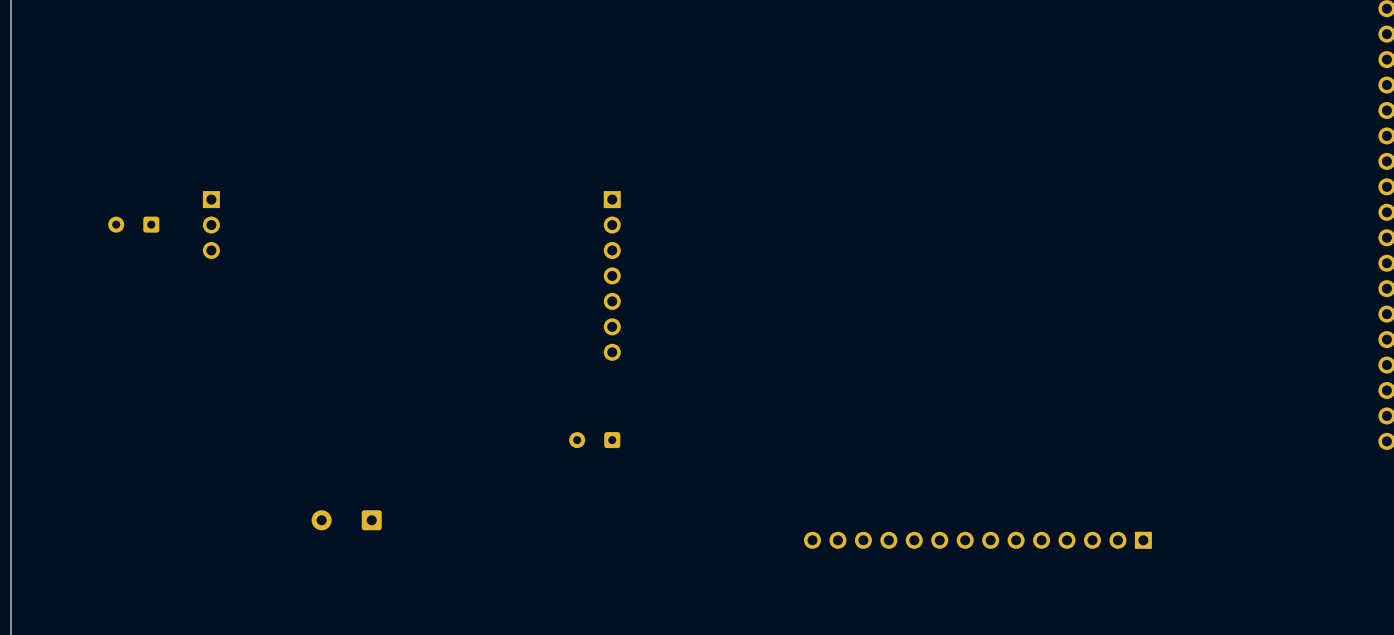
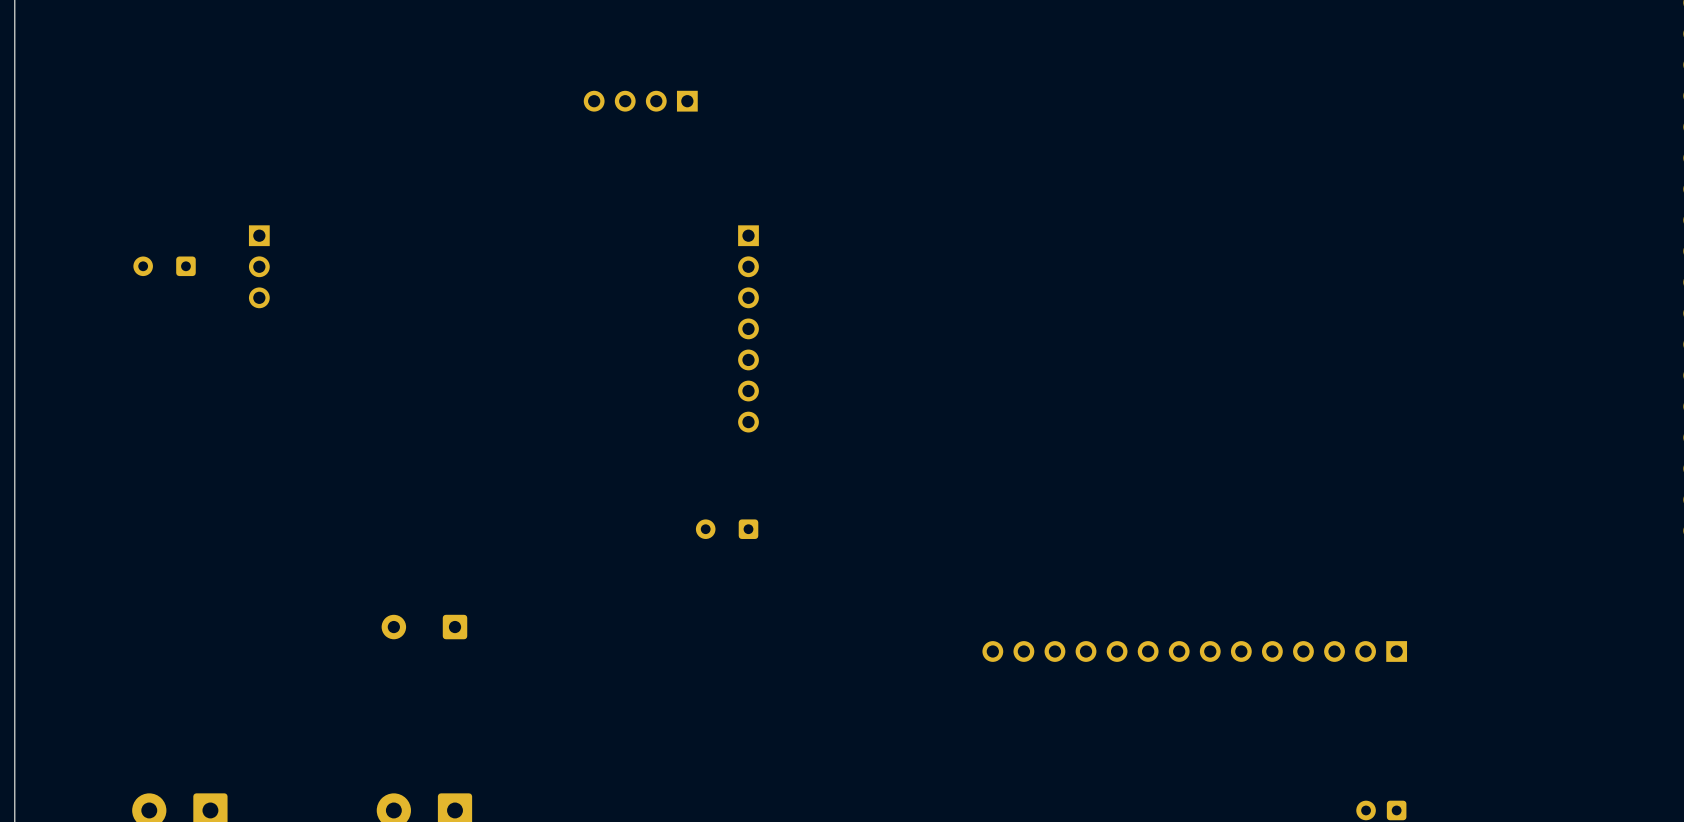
part: none -> (640, 101)

